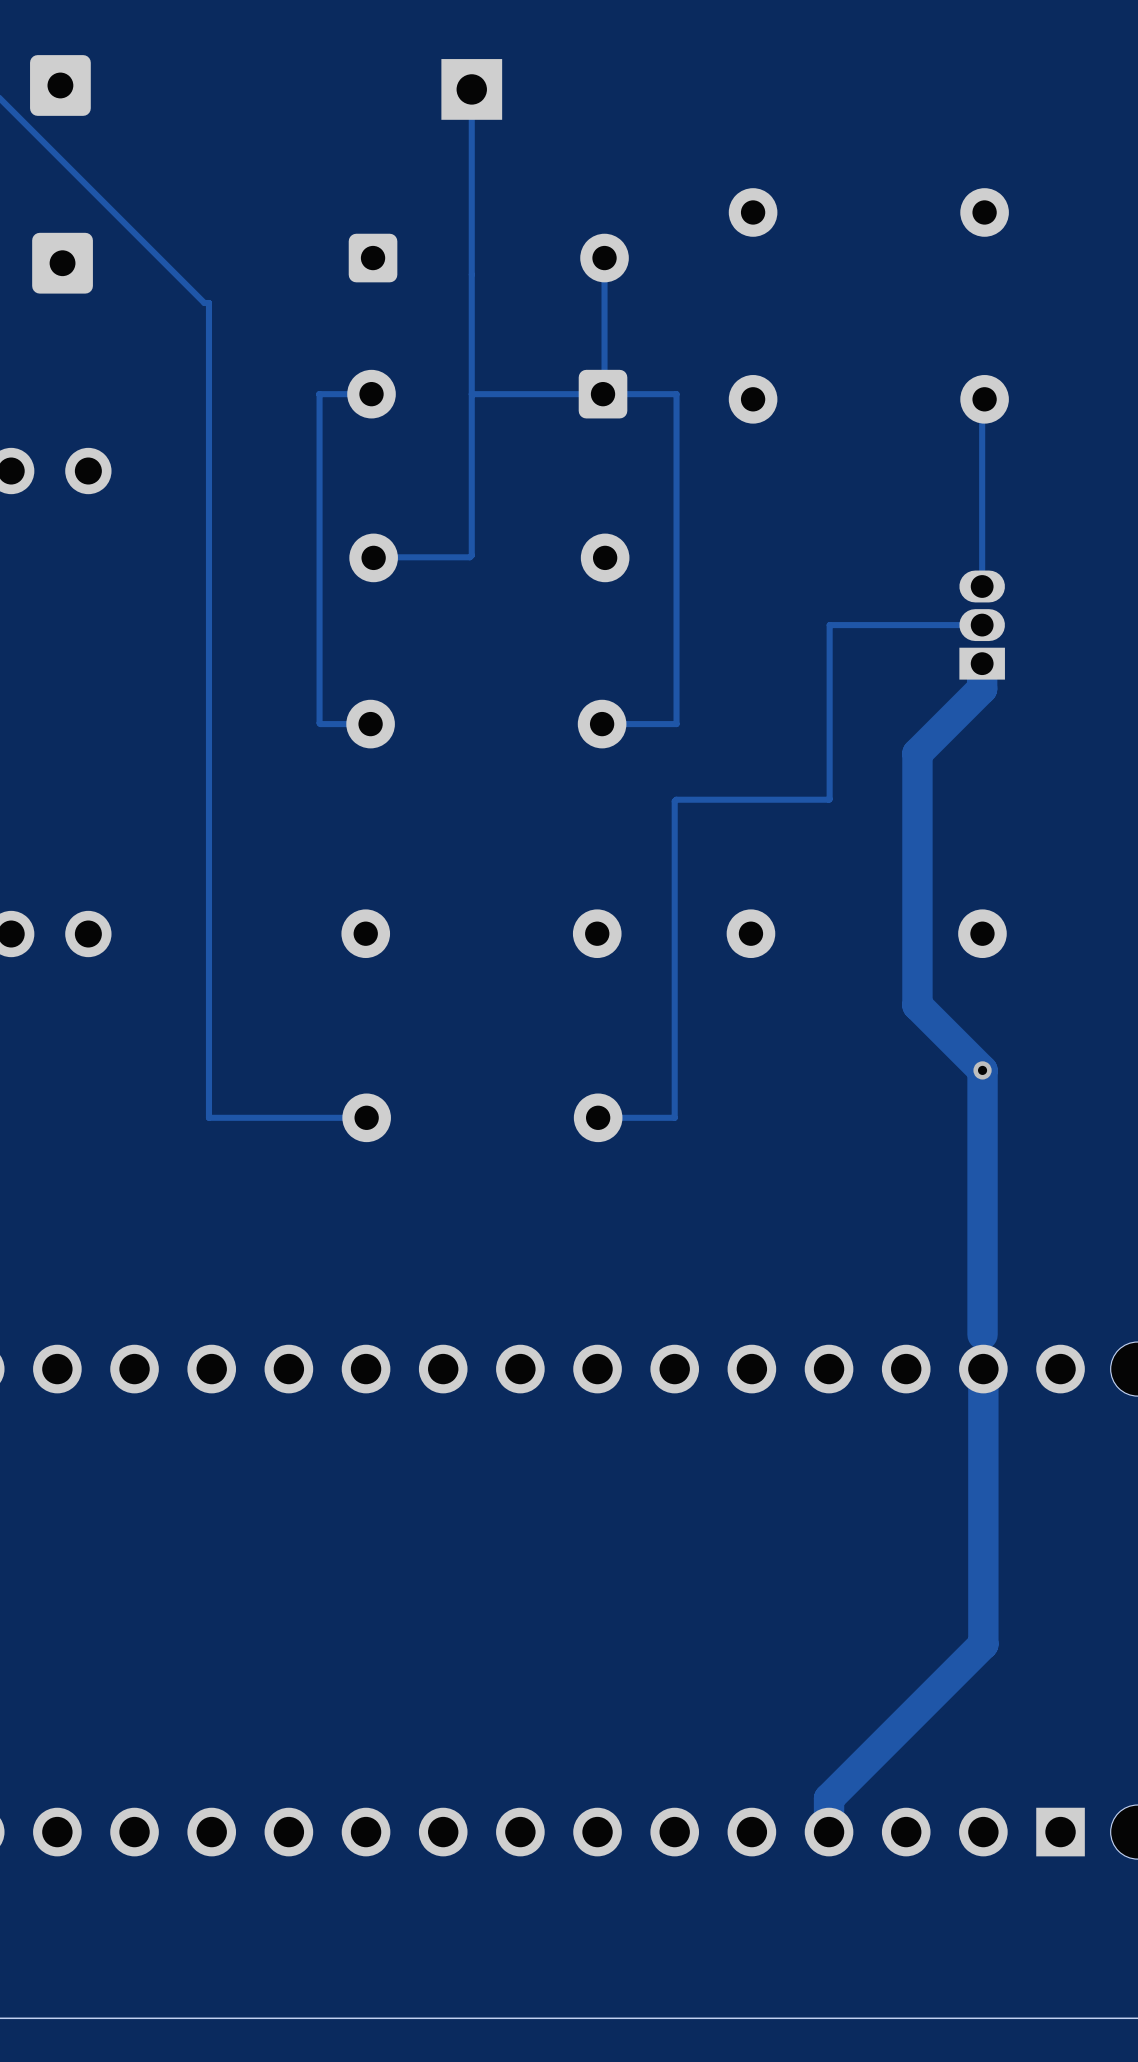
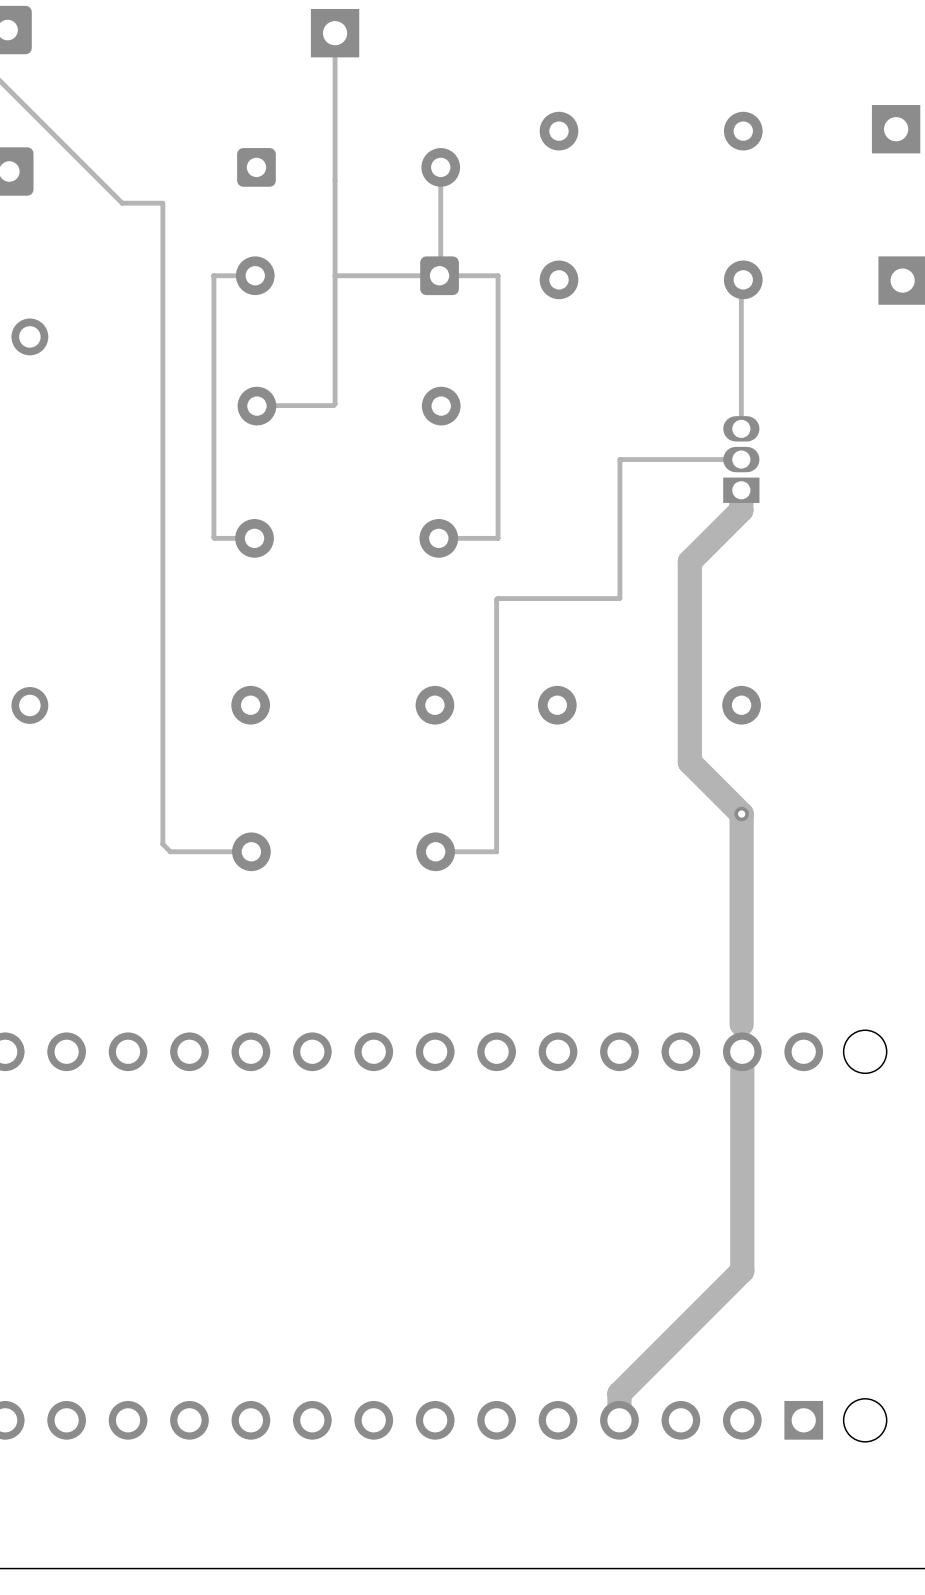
track: (208, 303) (208, 1117) (264, 1117) -> (162, 203) (162, 844) (170, 851)
track: none -> (125, 203) (162, 203)

